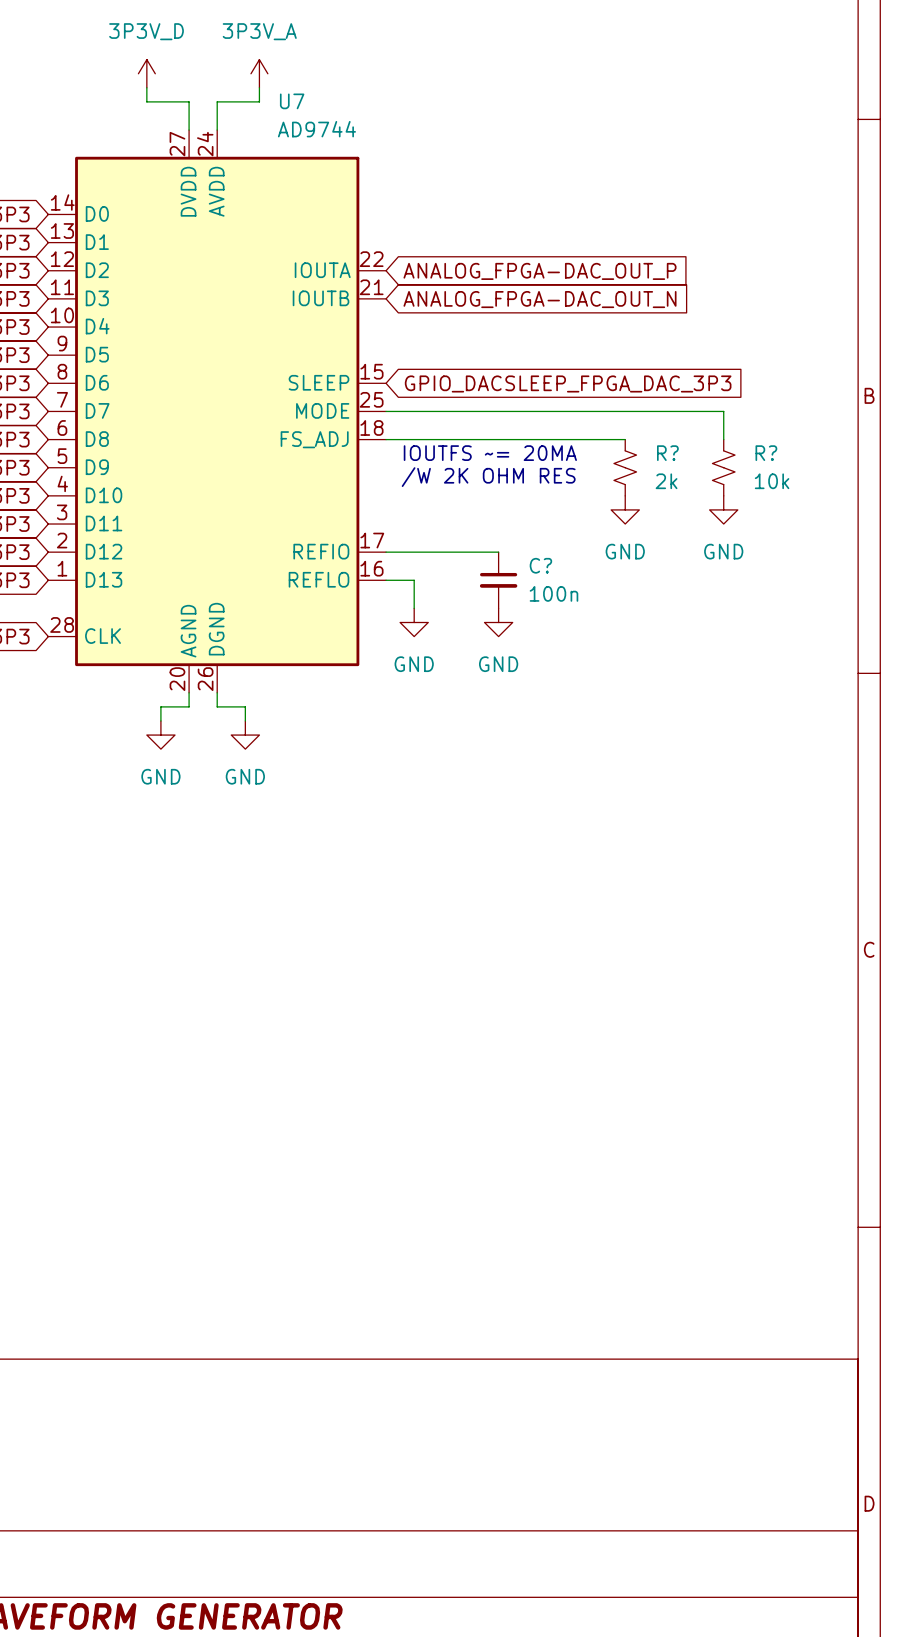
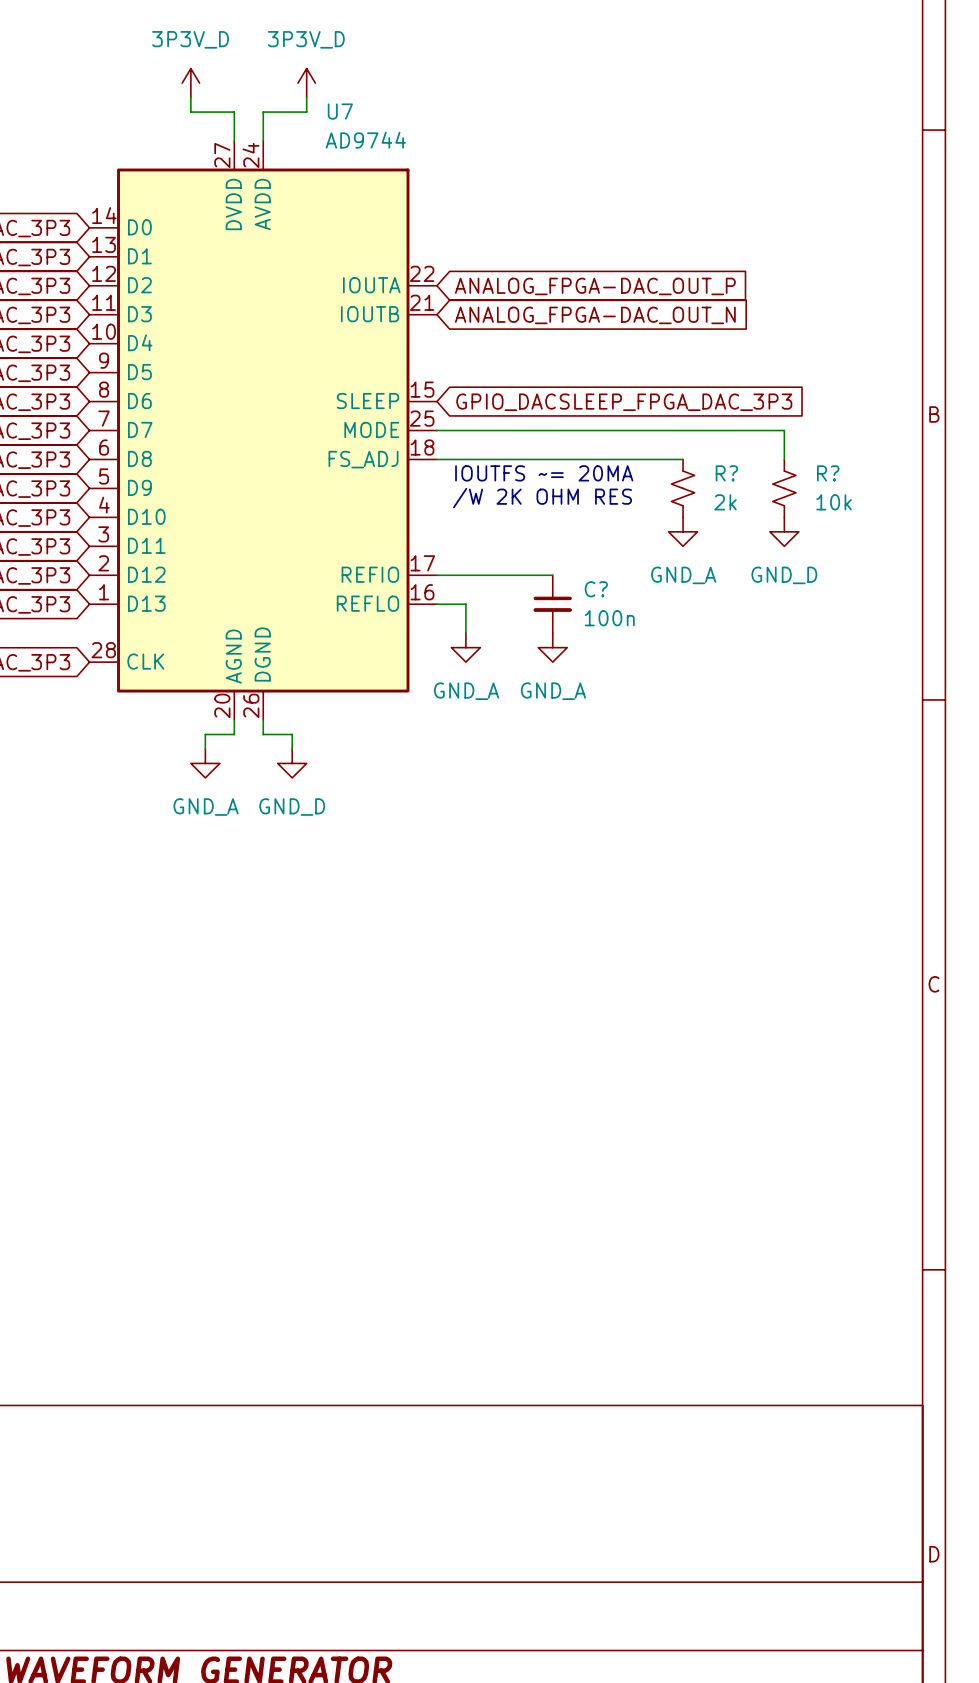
power symbol: 3P3V_A (259, 73) -> 3P3V_D (306, 83)
power symbol: GND (625, 509) -> GND_A (683, 531)
power symbol: GND (723, 509) -> GND_D (784, 531)
power symbol: GND (414, 622) -> GND_A (465, 647)
power symbol: GND (498, 622) -> GND_A (552, 647)
power symbol: GND (160, 735) -> GND_A (205, 763)
power symbol: GND (245, 735) -> GND_D (292, 763)

